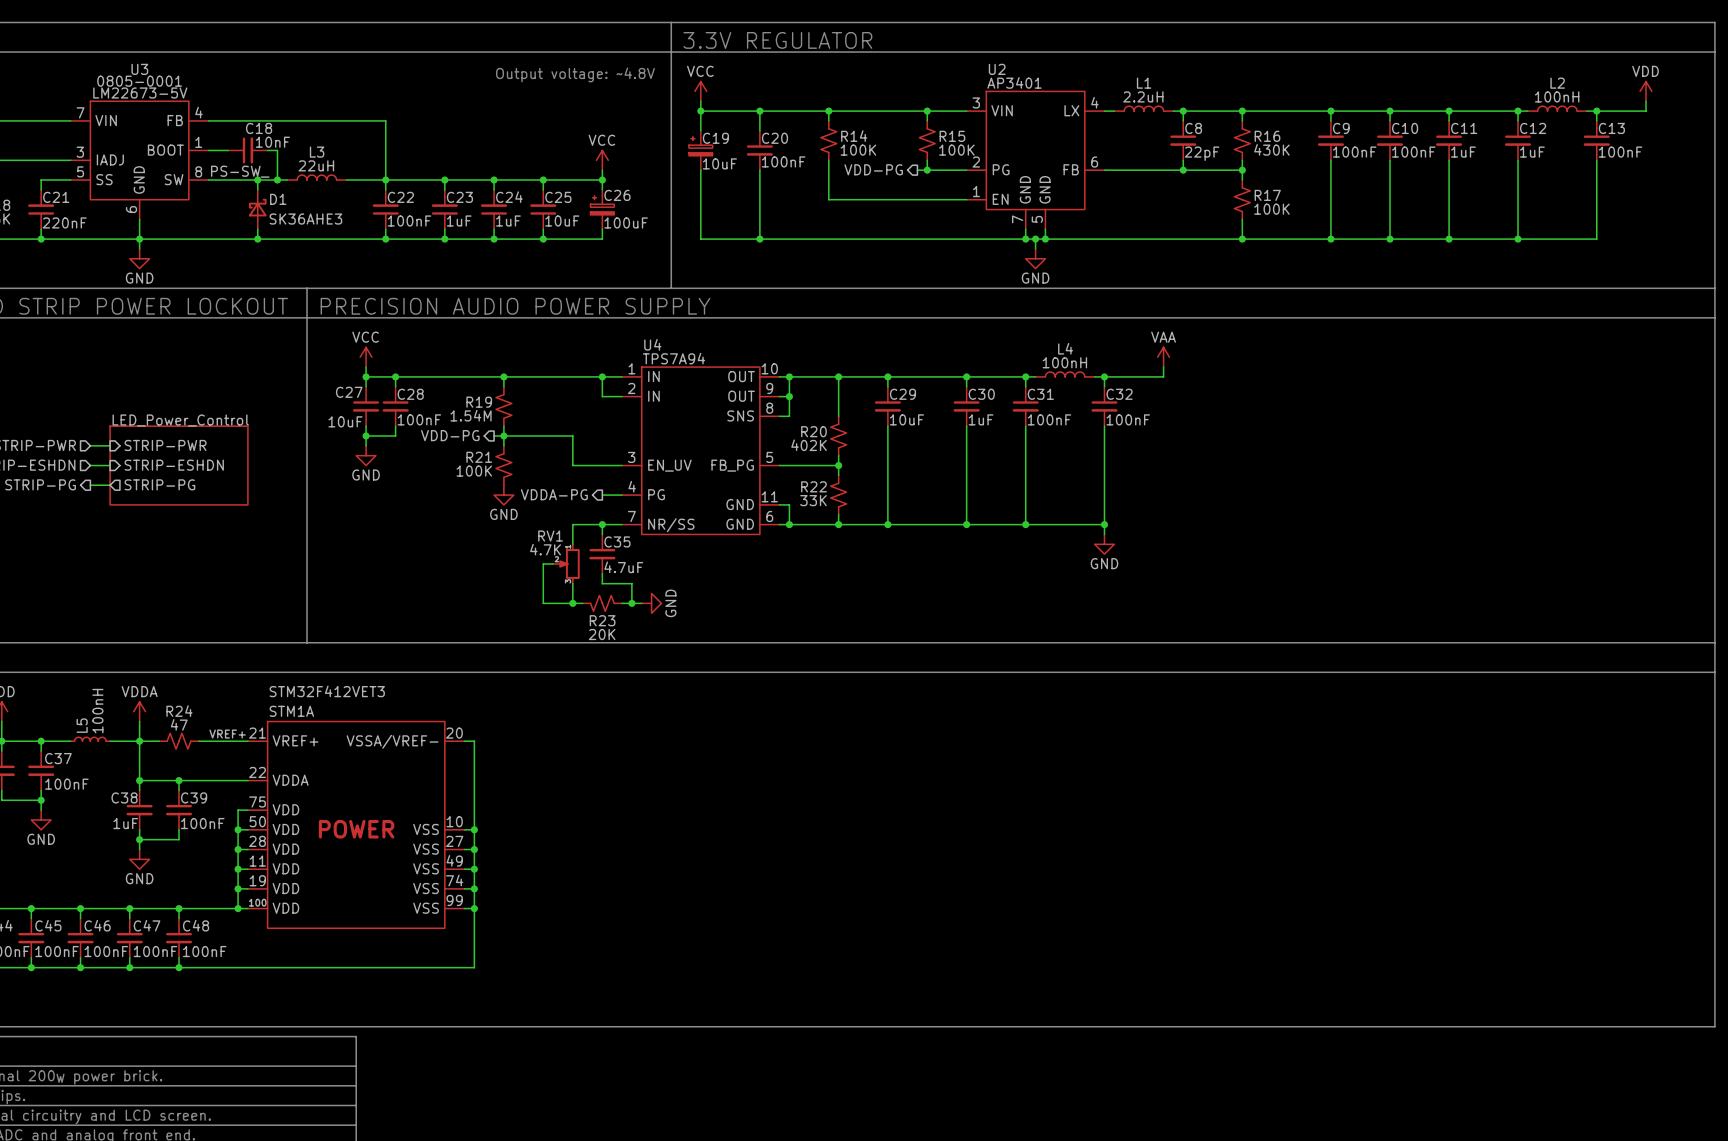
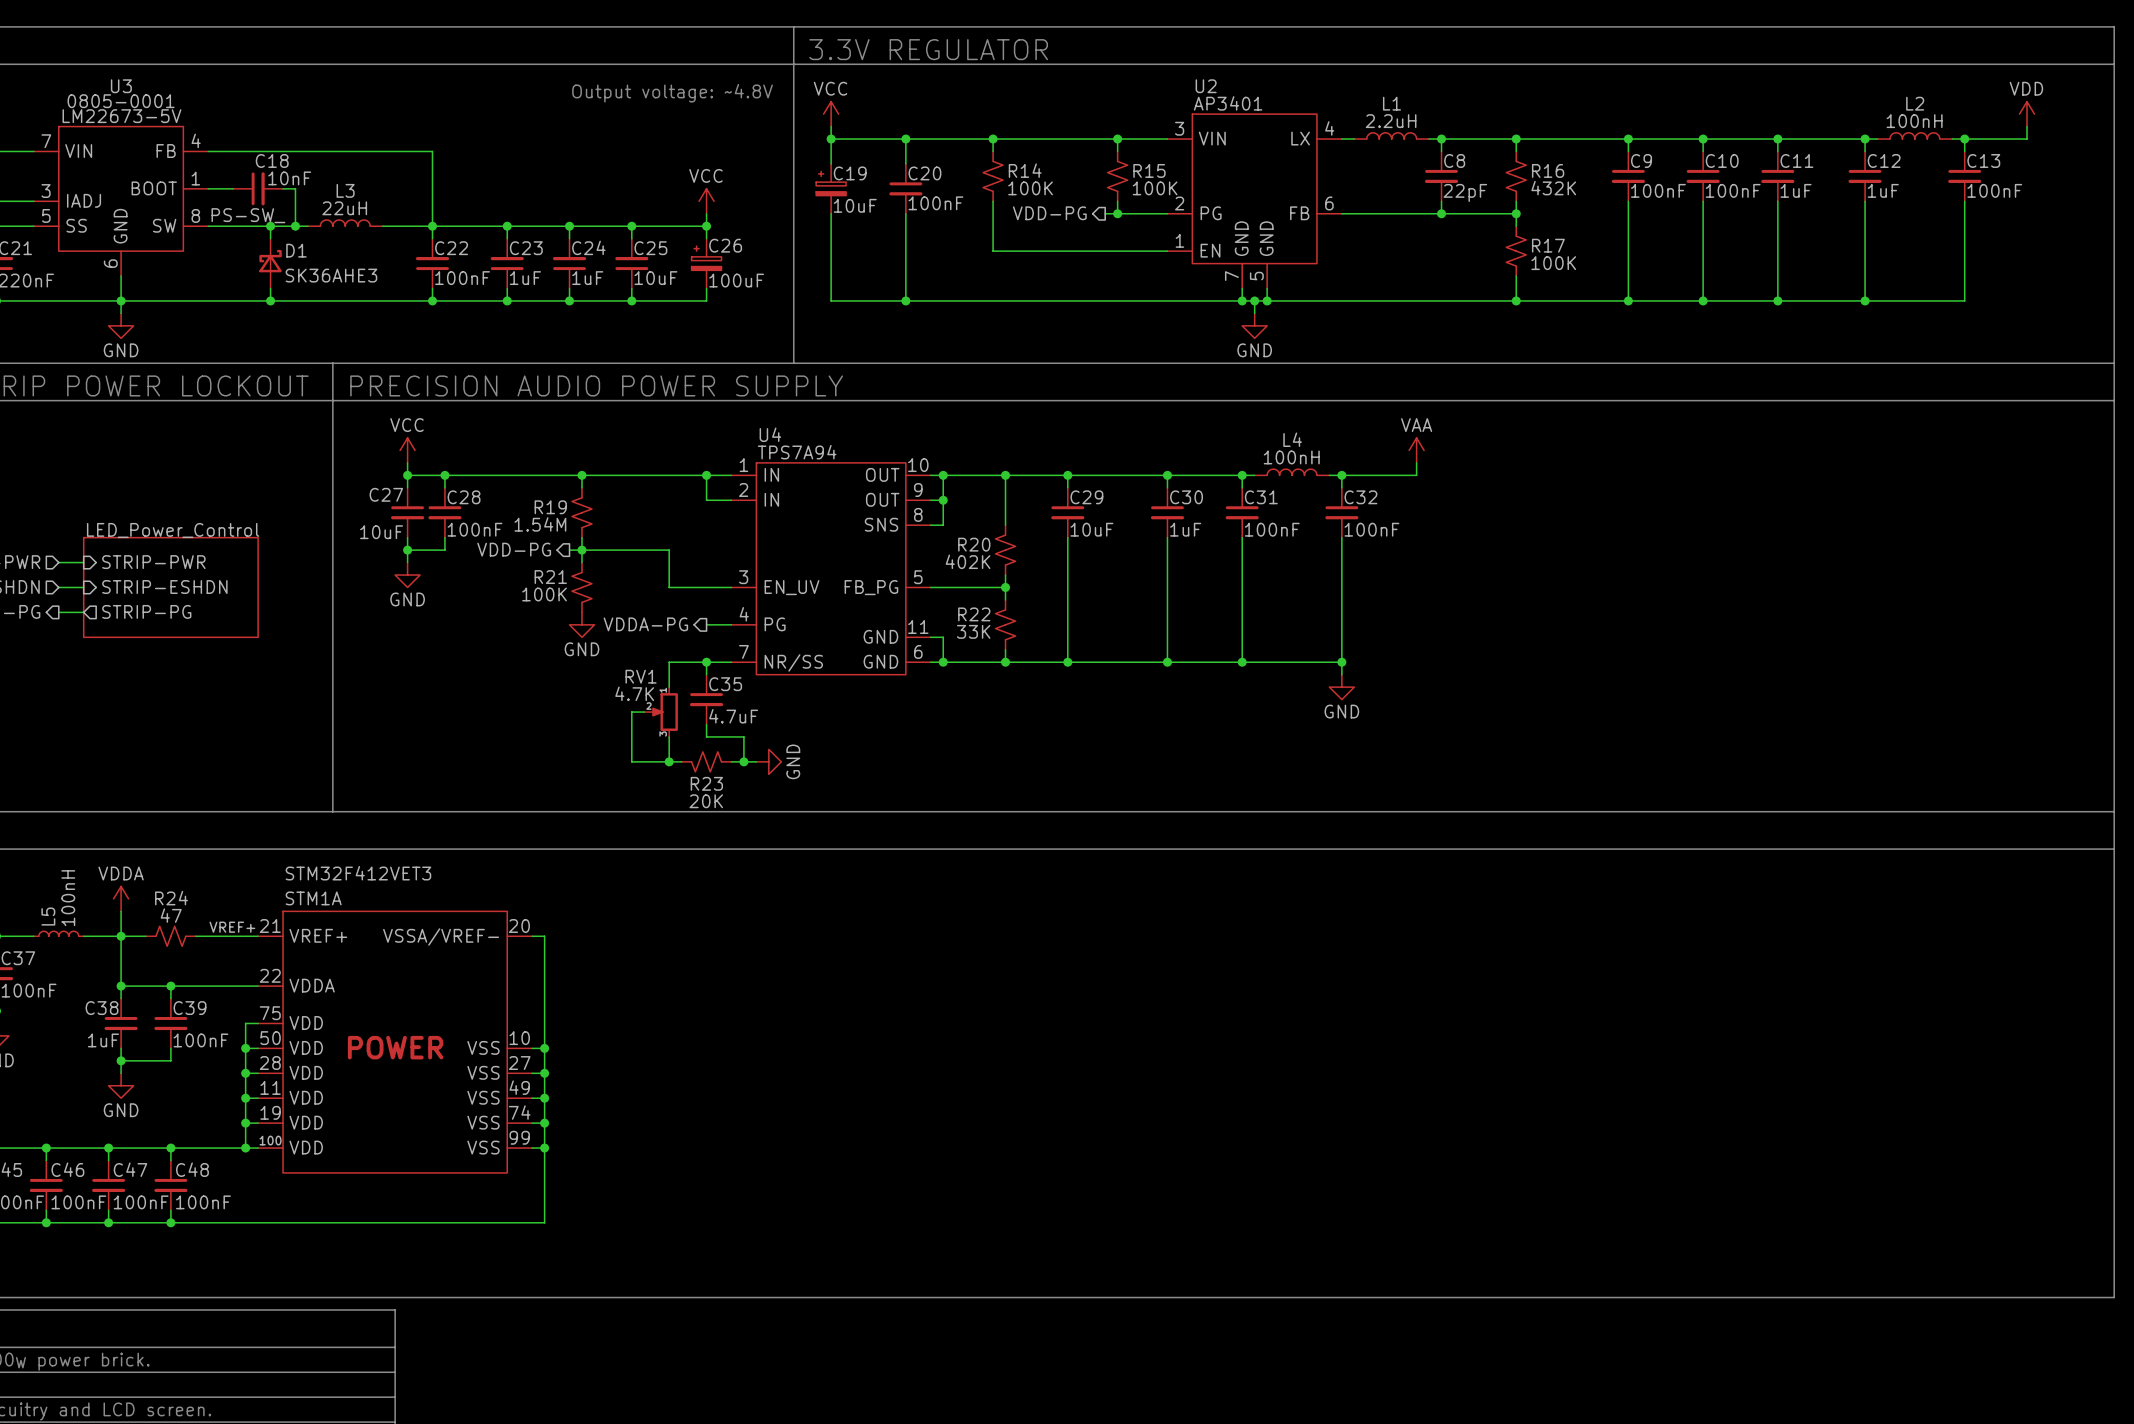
R16 value: 430K (1271, 149) -> 432K (1553, 188)

